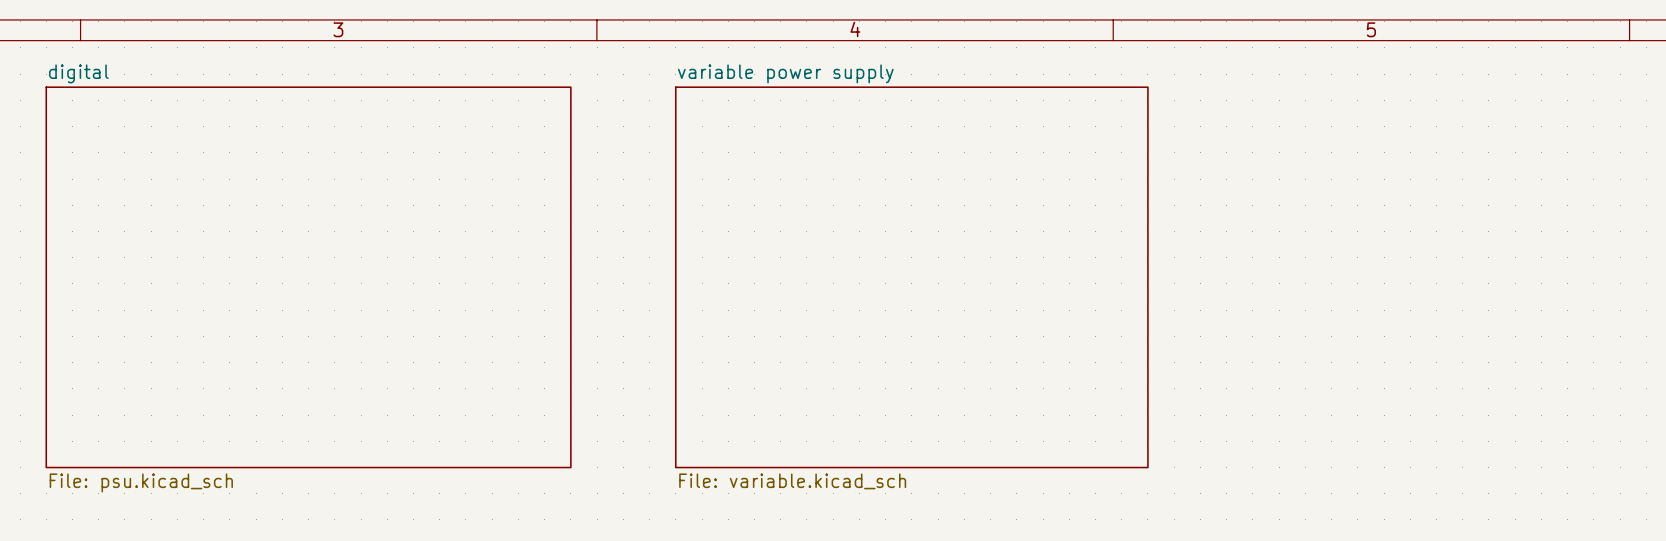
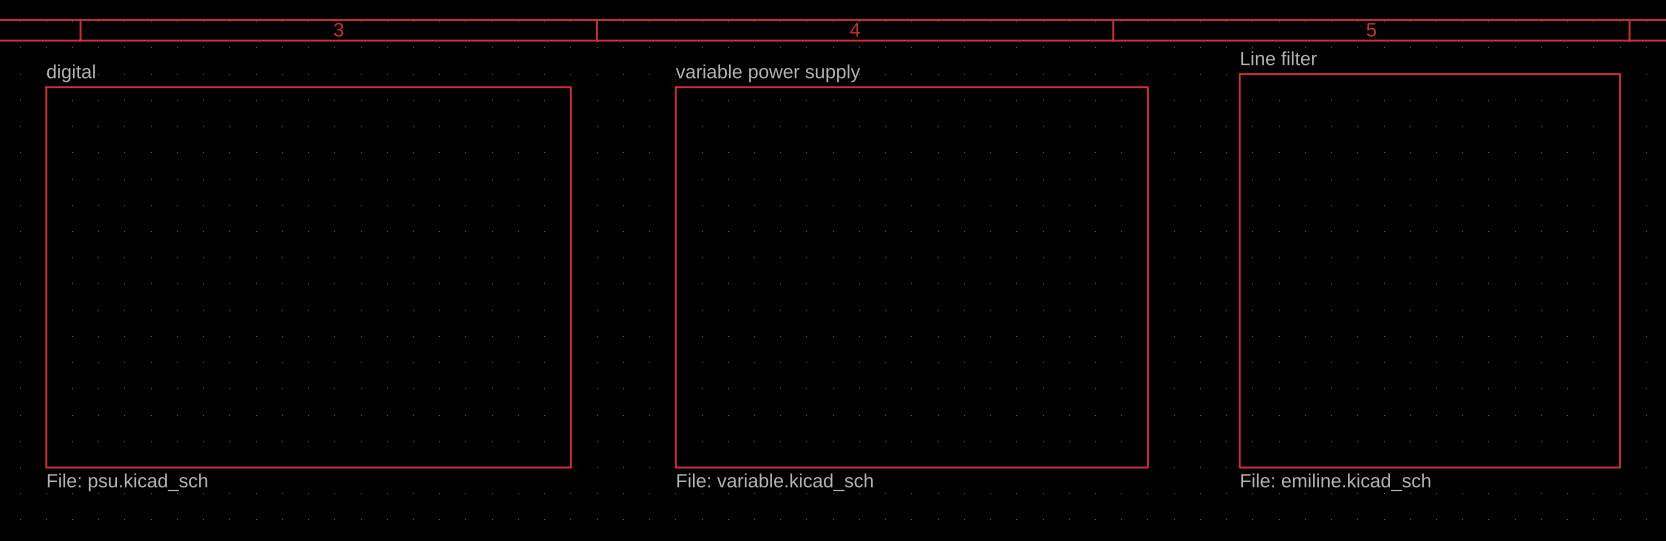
sheet Line filter: none -> File: emiline.kicad_sch (1429, 270)

